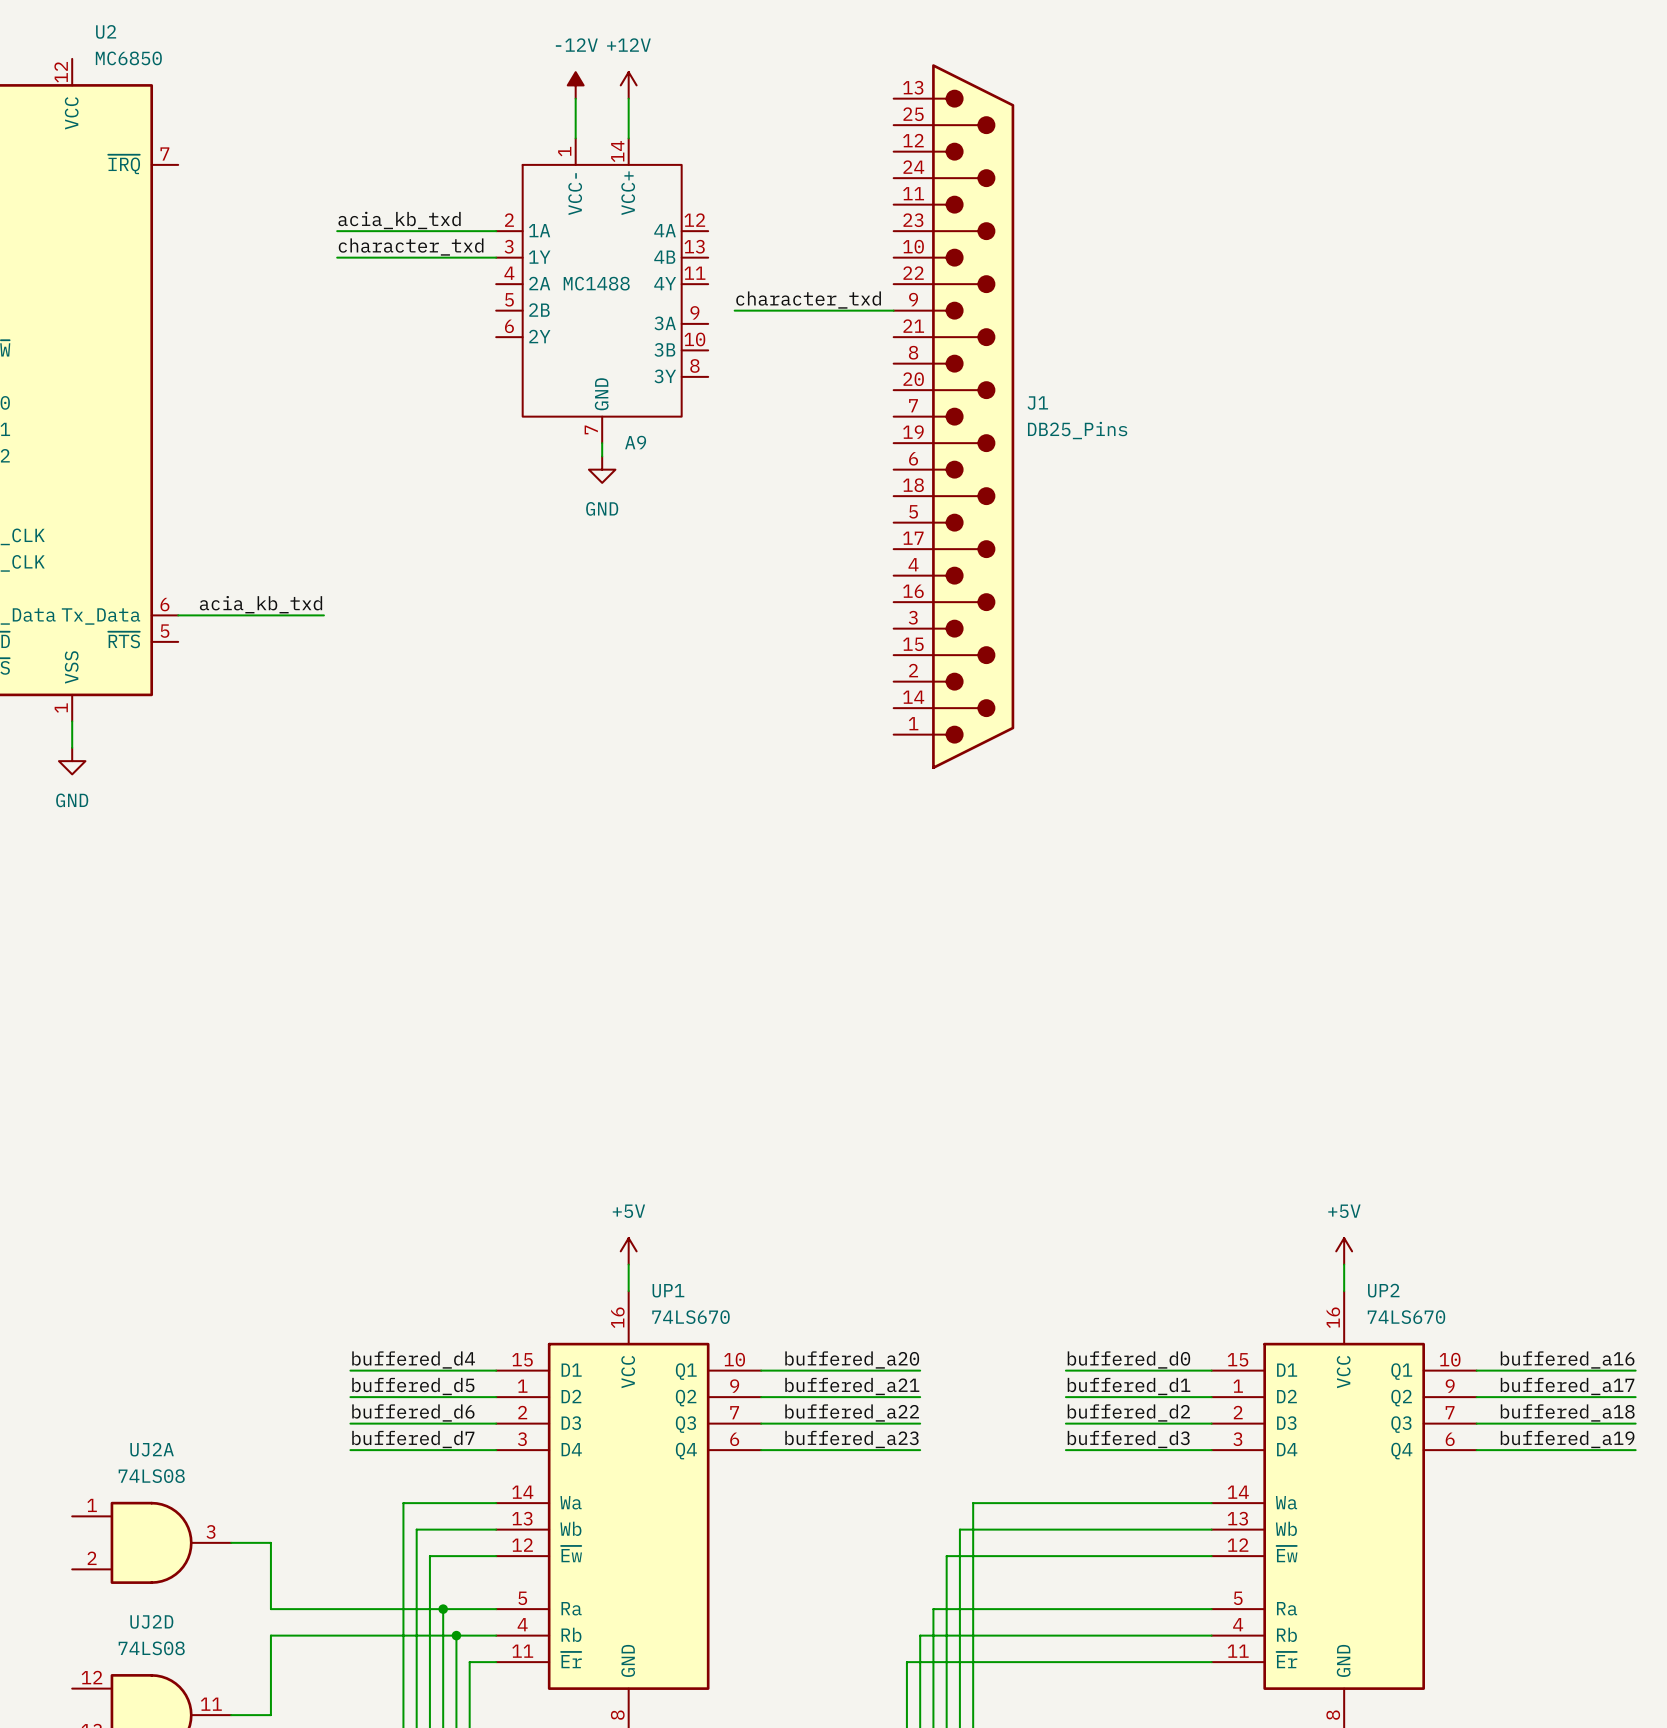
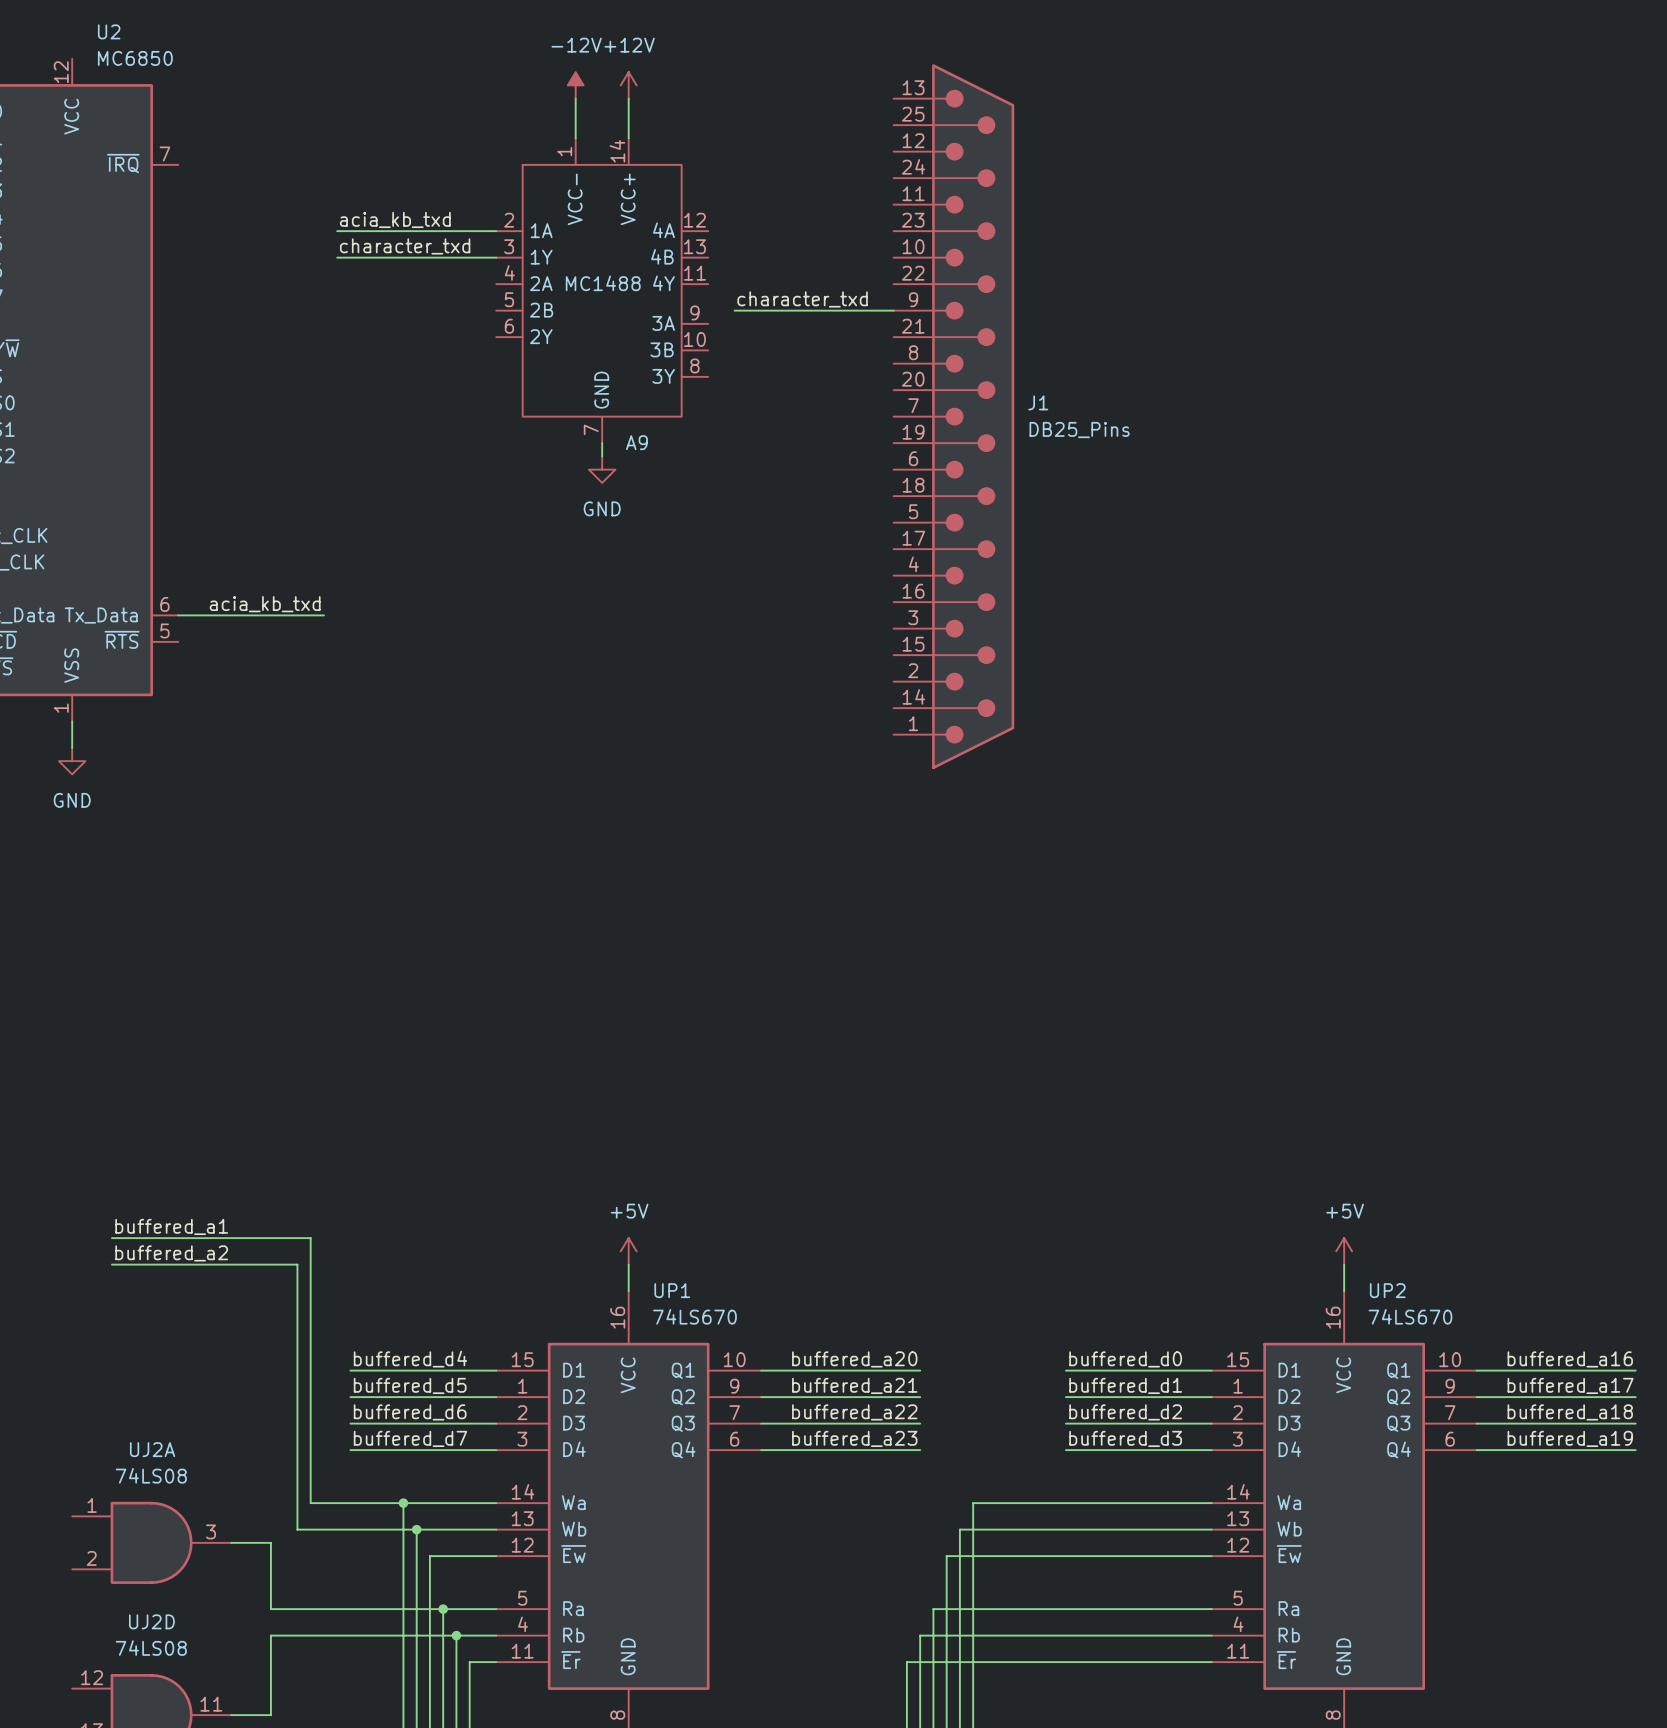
label: none -> buffered_a1 (171, 1226)
wire: none -> (111, 1238) (310, 1238) (310, 1503) (403, 1503)
label: none -> buffered_a2 (171, 1253)
wire: none -> (111, 1264) (297, 1264) (297, 1529) (416, 1529)
junction: none -> (403, 1503)
junction: none -> (416, 1529)

